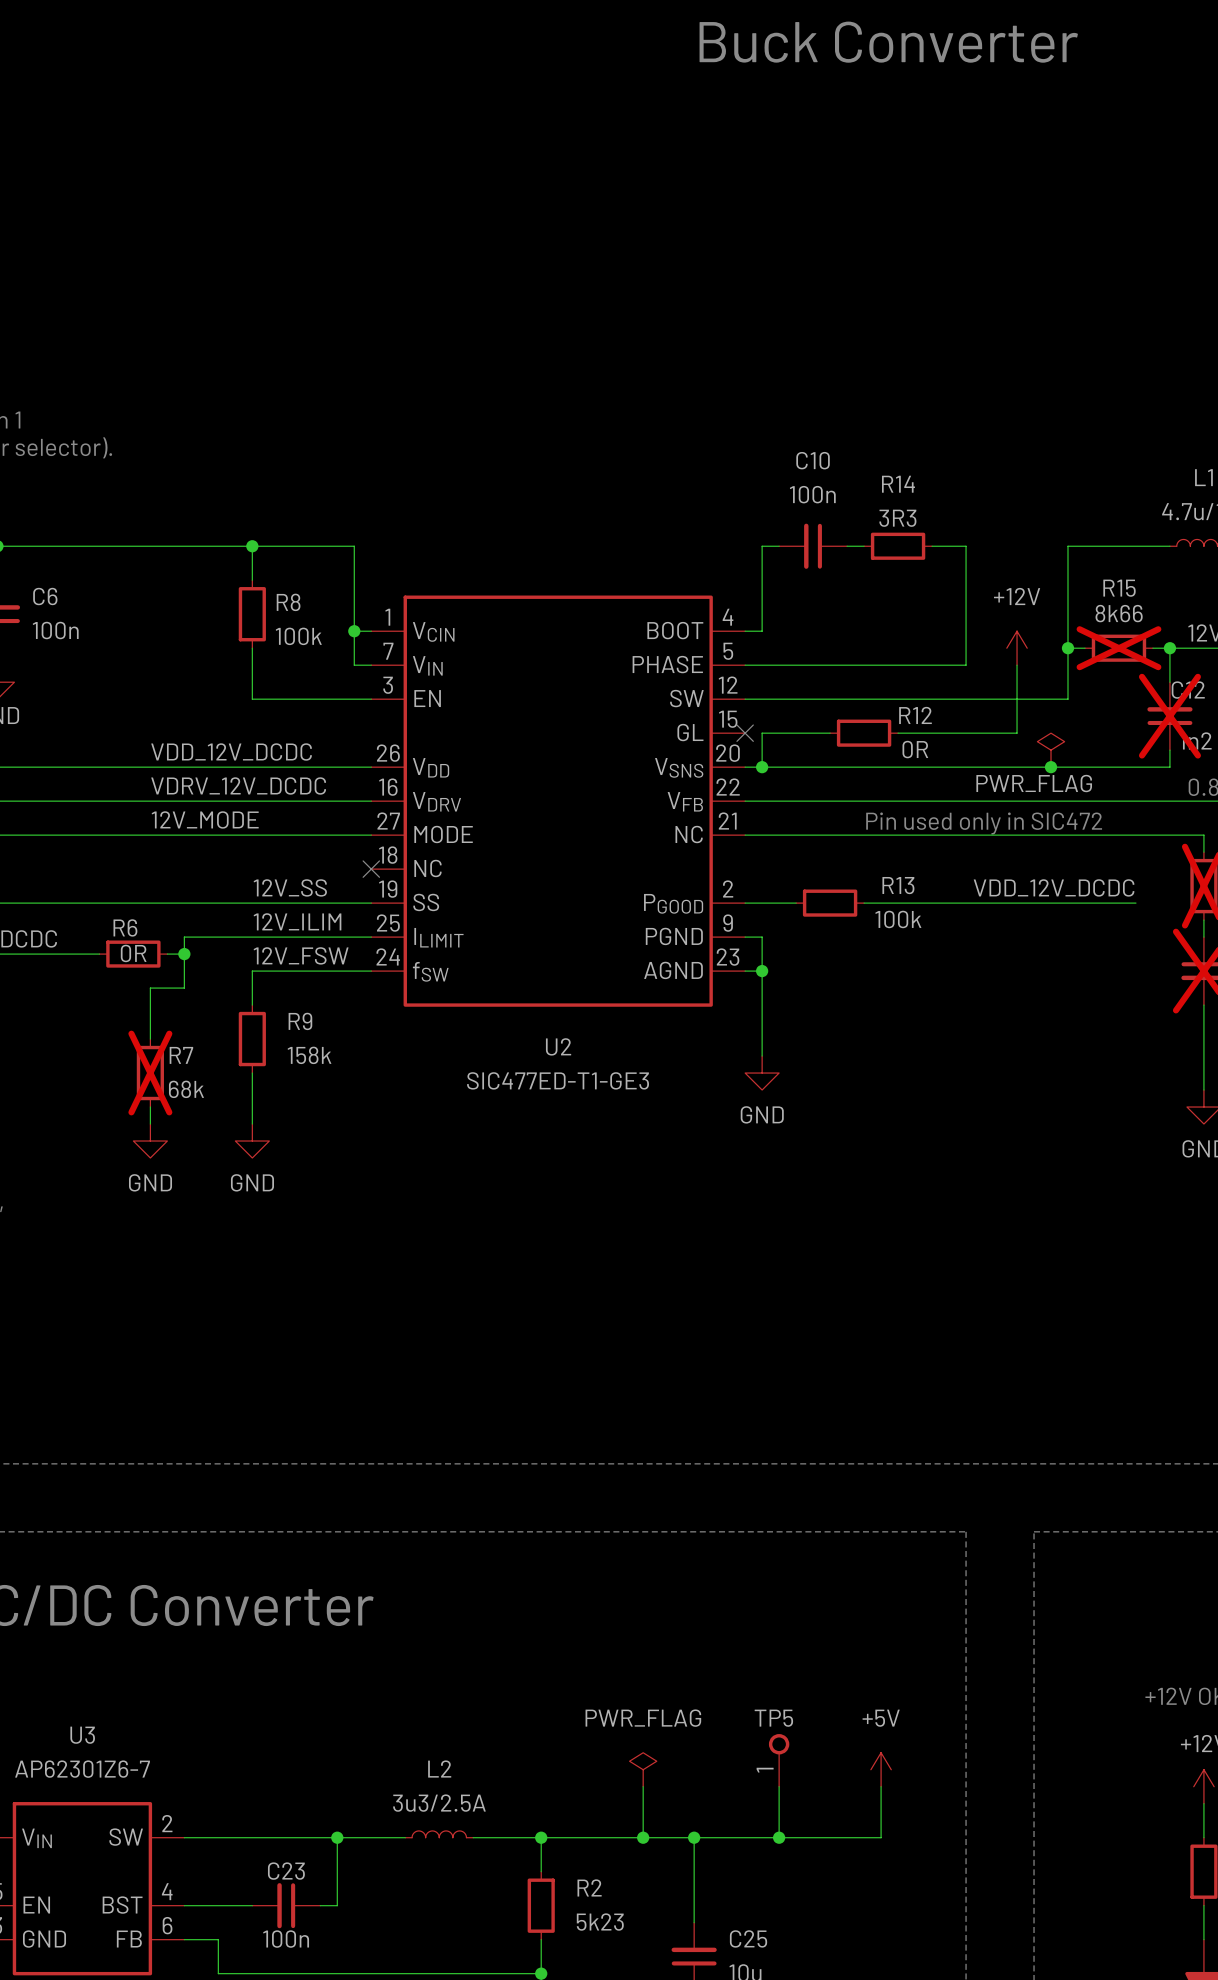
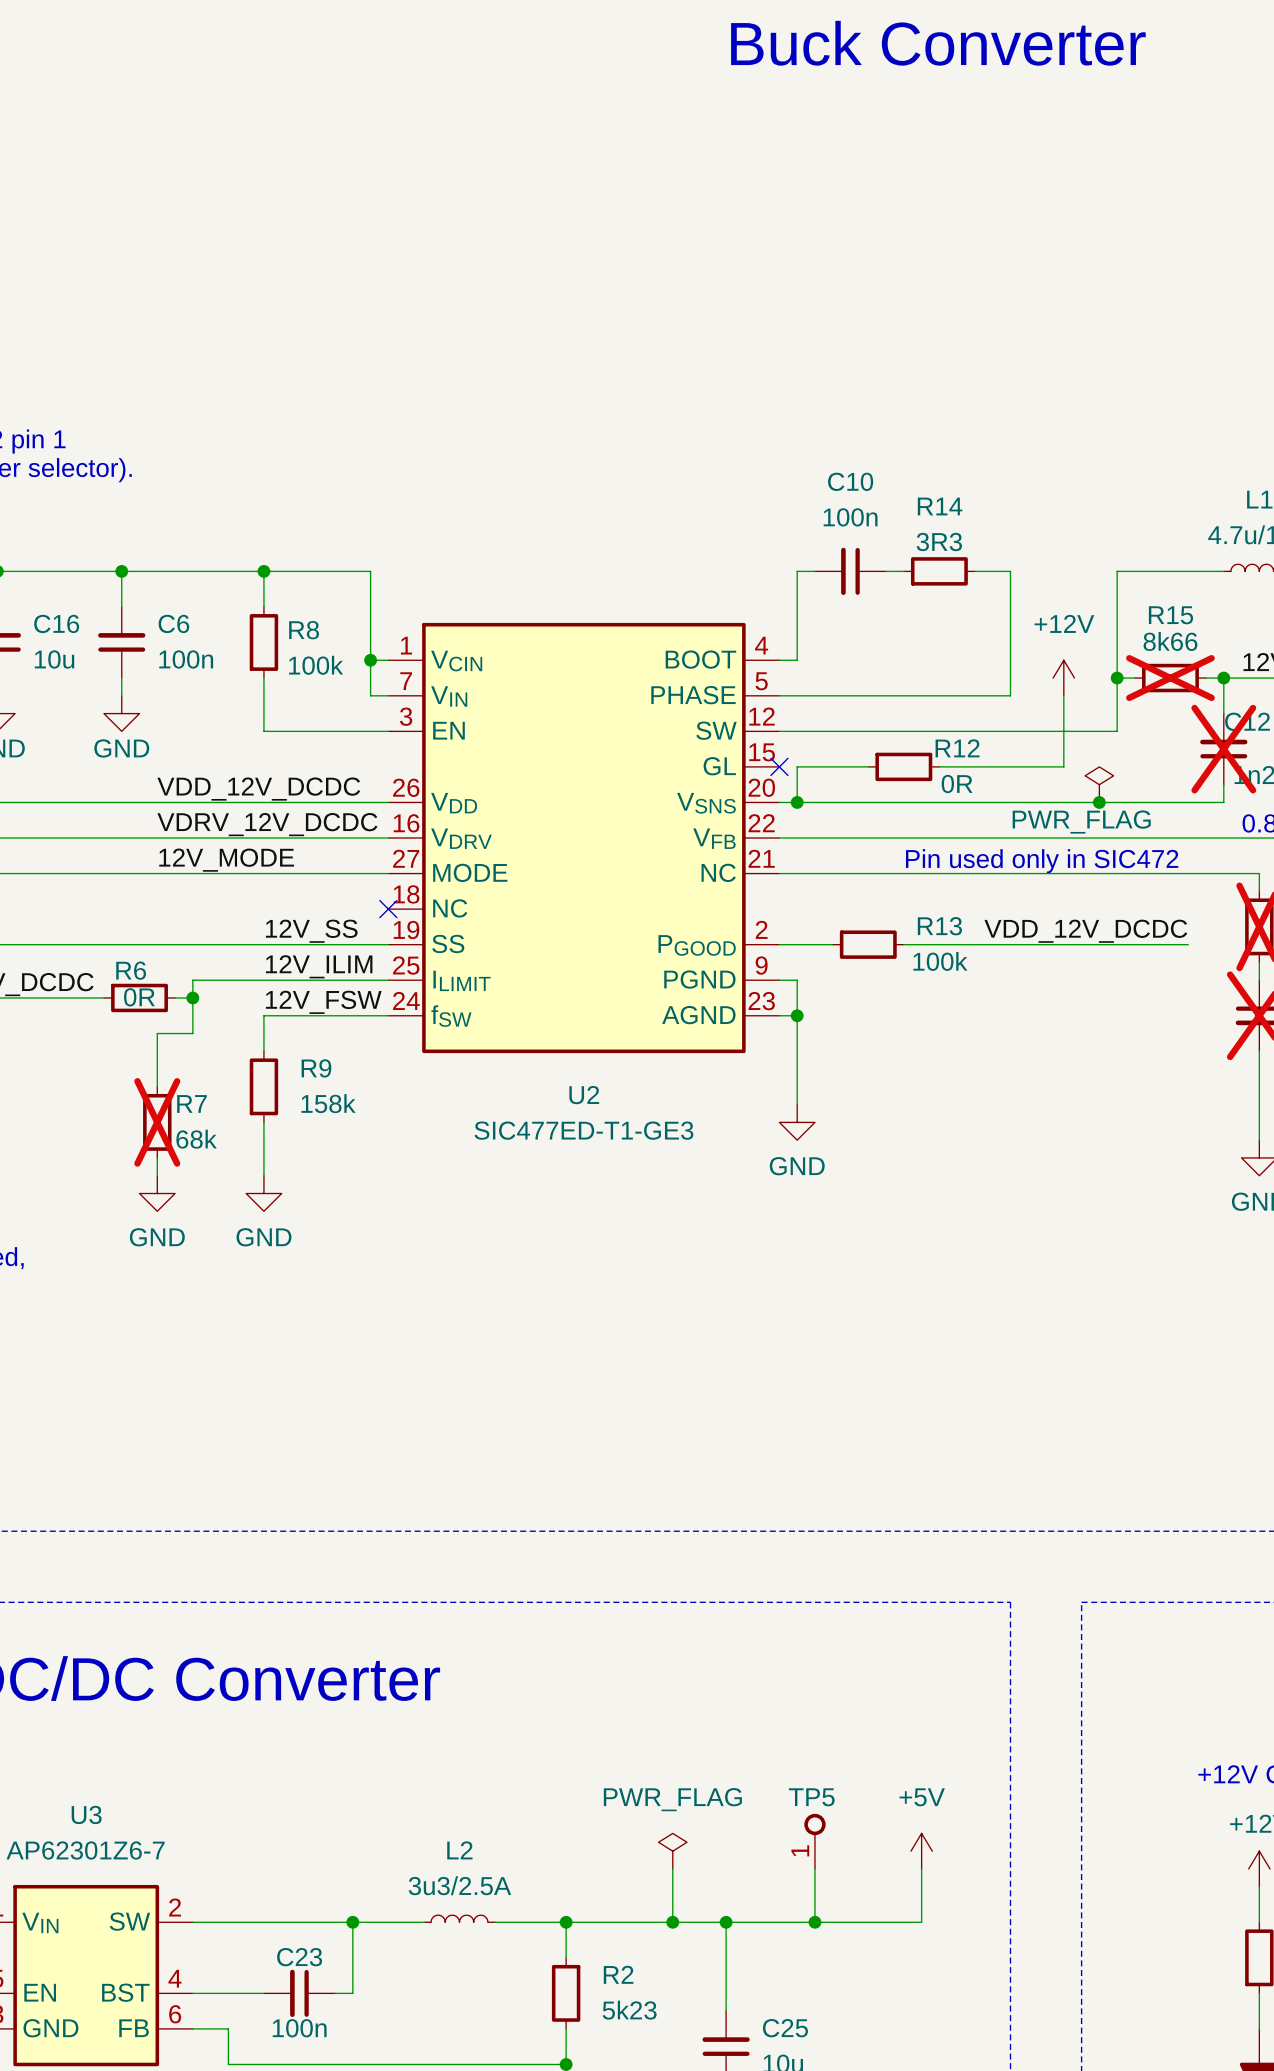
wire: none -> (121, 571) (121, 606)
junction: none -> (121, 571)
C6 name: C6 (45, 596) -> C16 (56, 623)
C6: none -> (121, 642)
C6 text: 100n (55, 630) -> 10u (54, 659)
wire: none -> (121, 678) (121, 695)
power symbol: none -> GND (121, 713)

